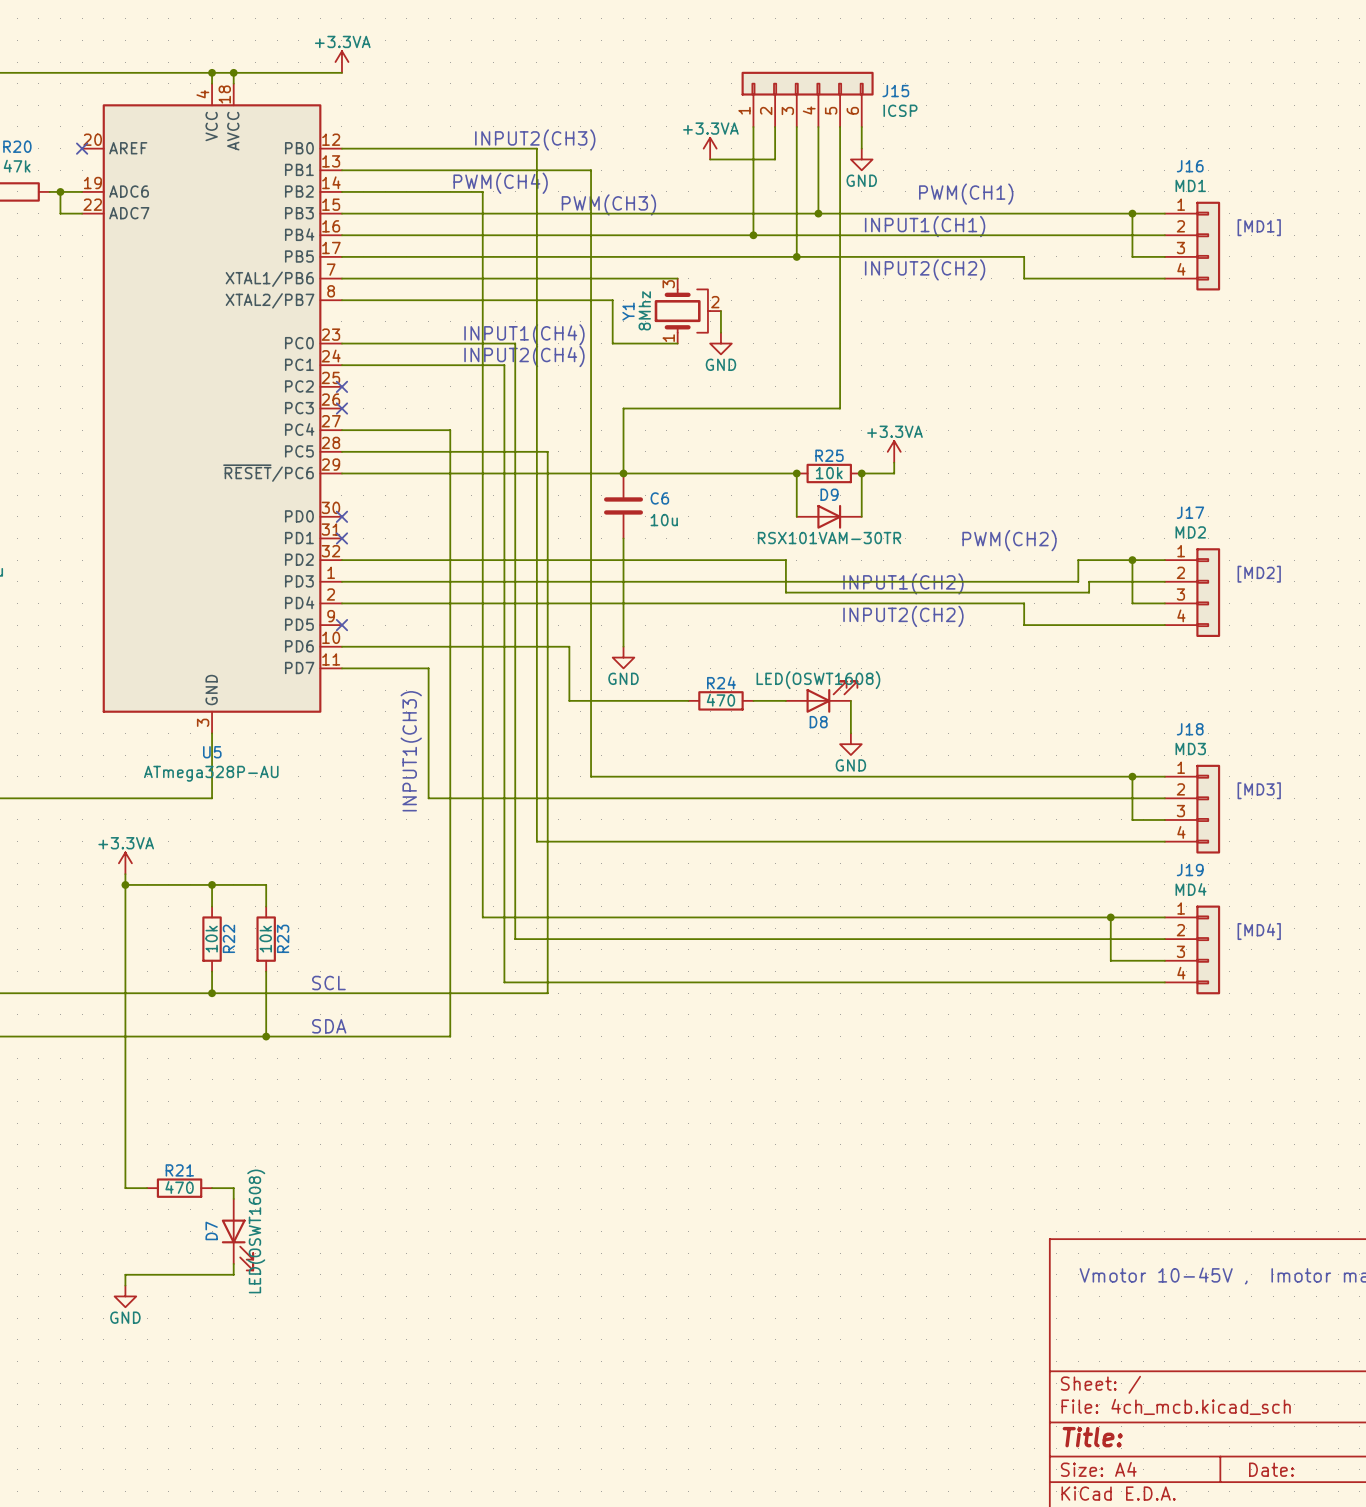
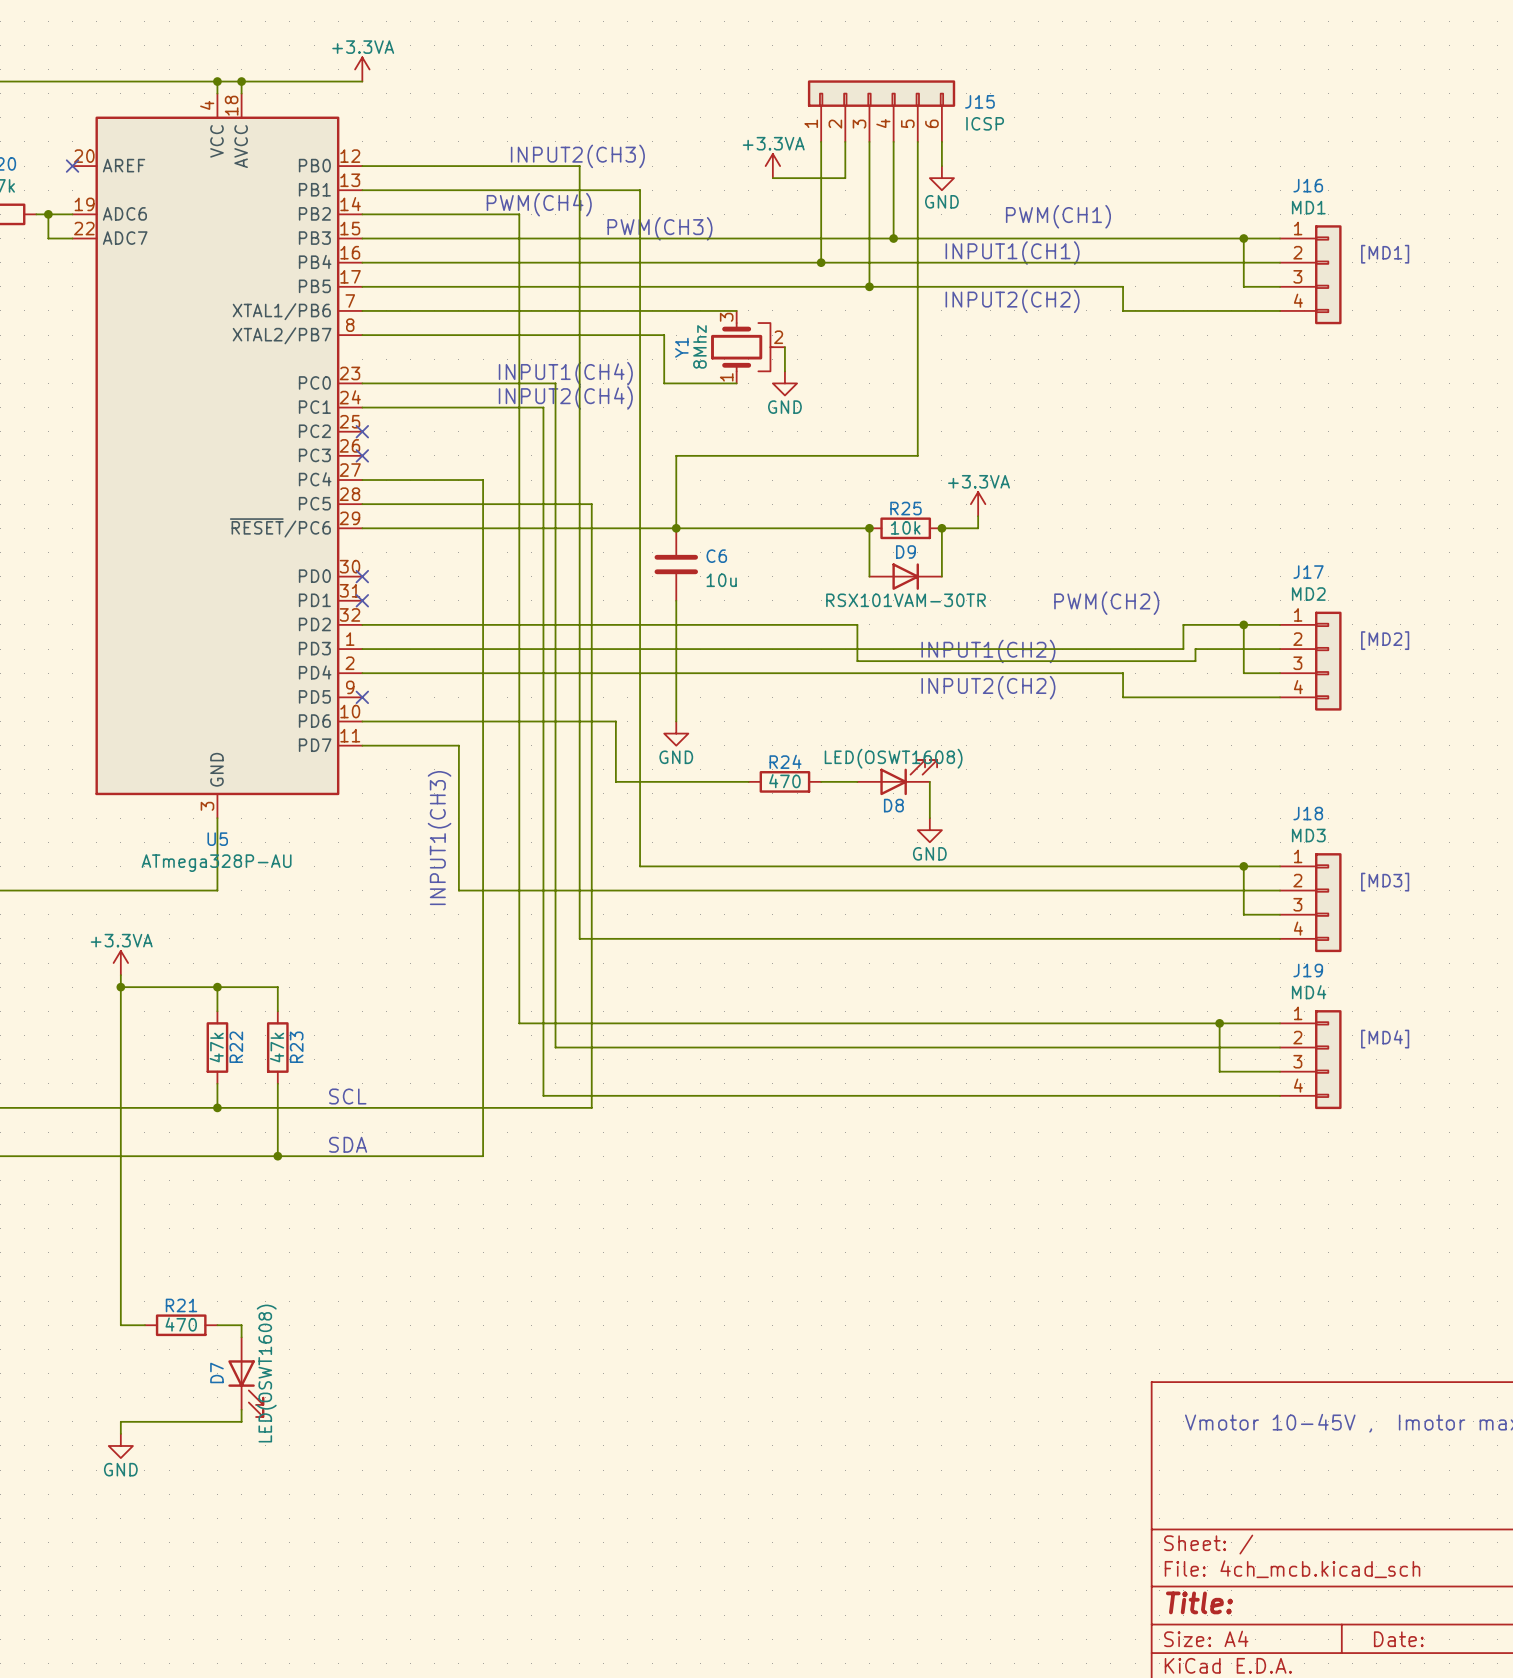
R22 value: 10k (211, 939) -> 47k (216, 1047)
R23 value: 10k (265, 939) -> 47k (277, 1047)

